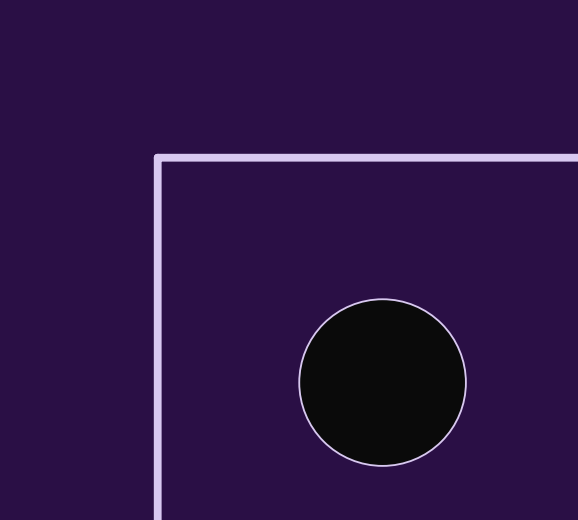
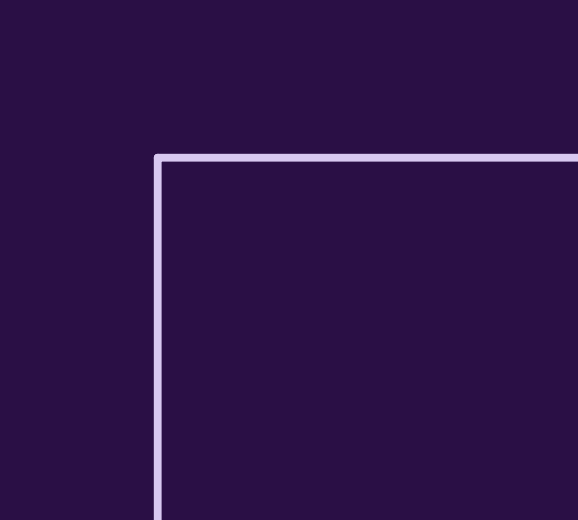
part: (382, 382) -> none

